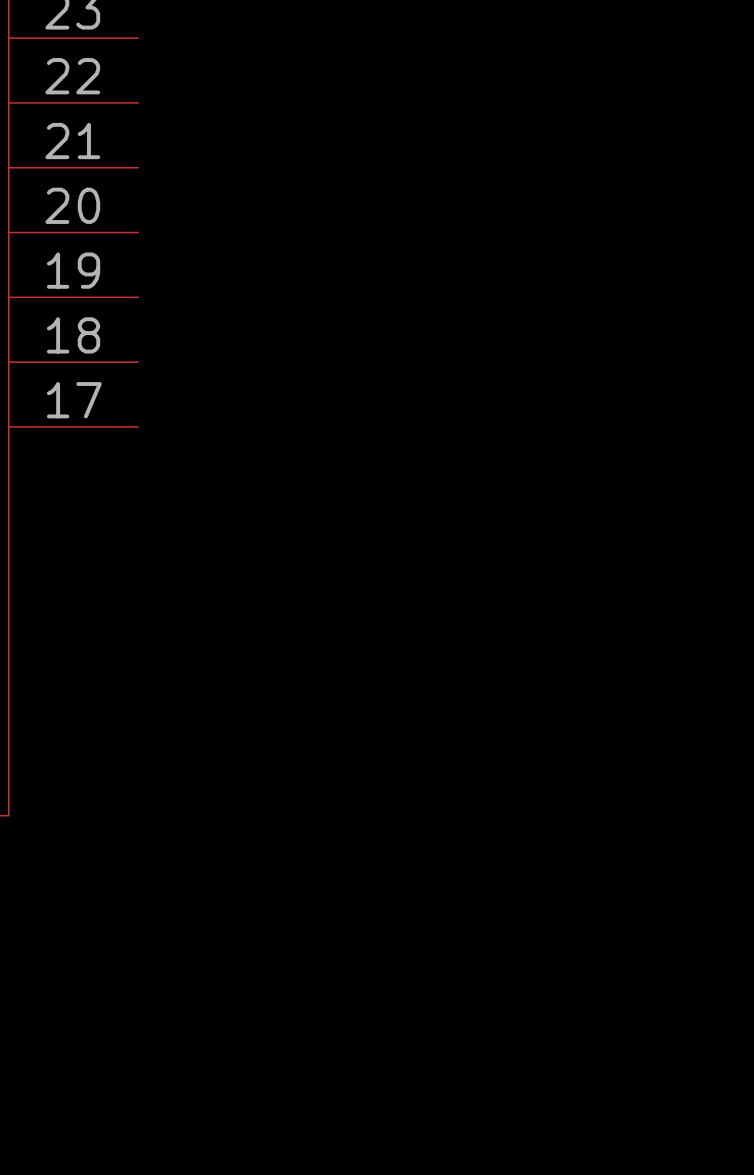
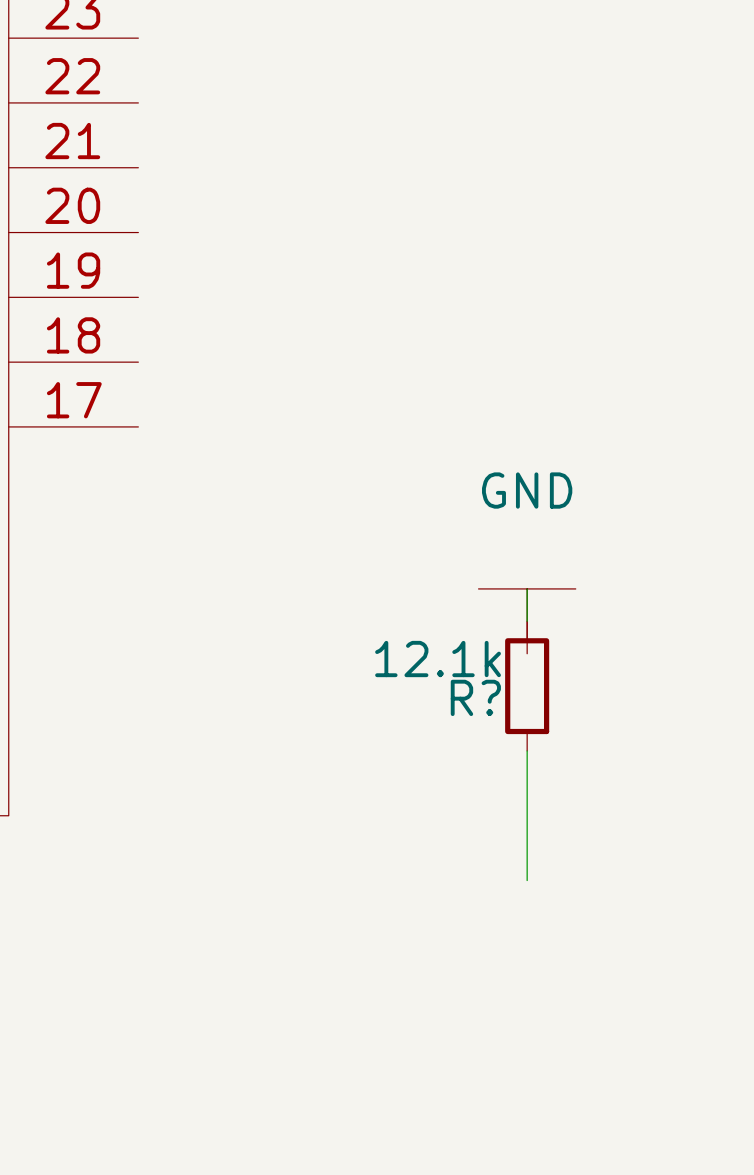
wire: none -> (527, 588) (527, 621)
power symbol: none -> GND (527, 621)
R?: none -> 12.1k (527, 686)
wire: none -> (527, 750) (527, 880)

